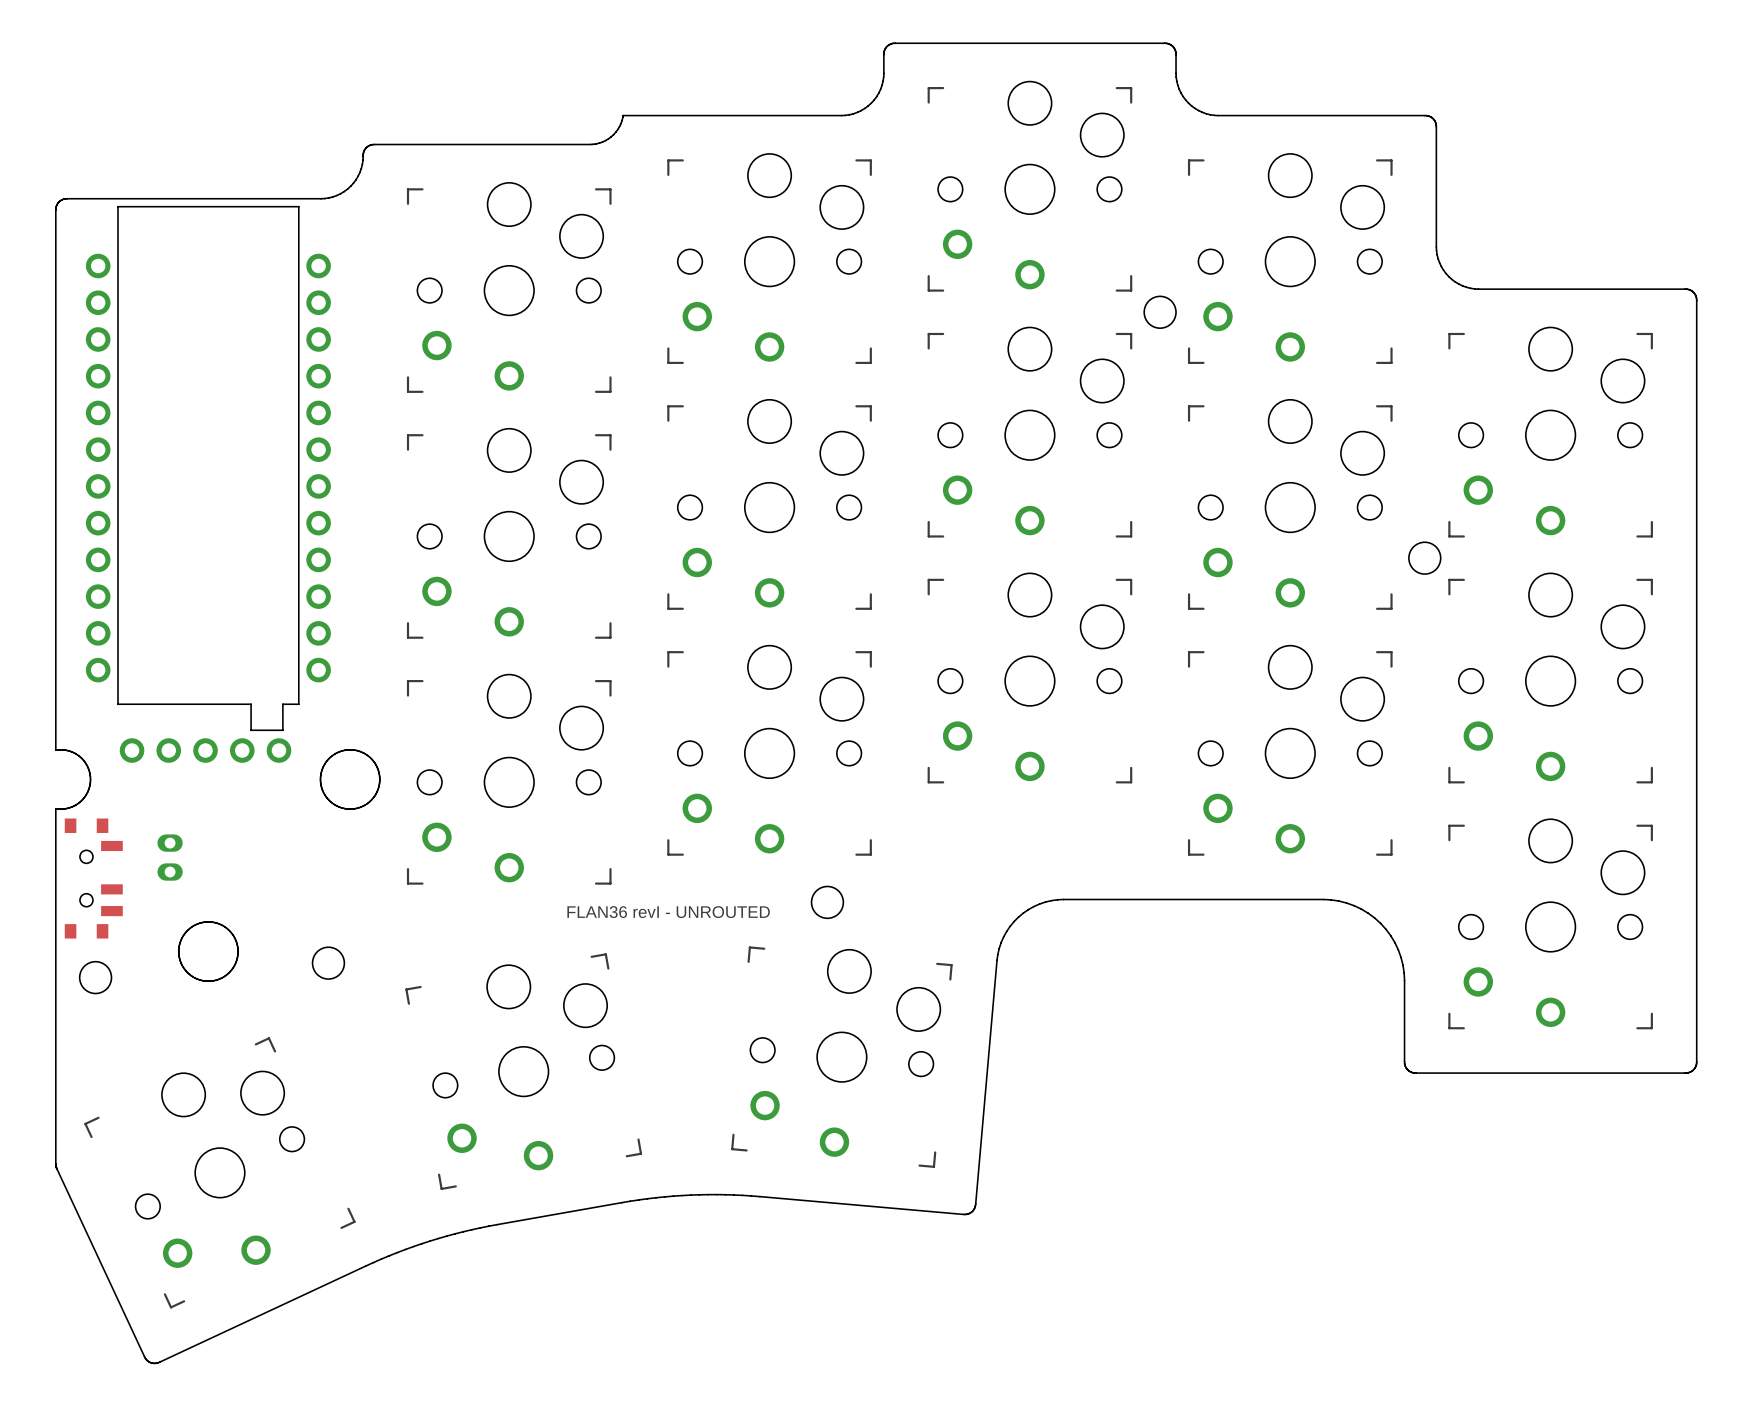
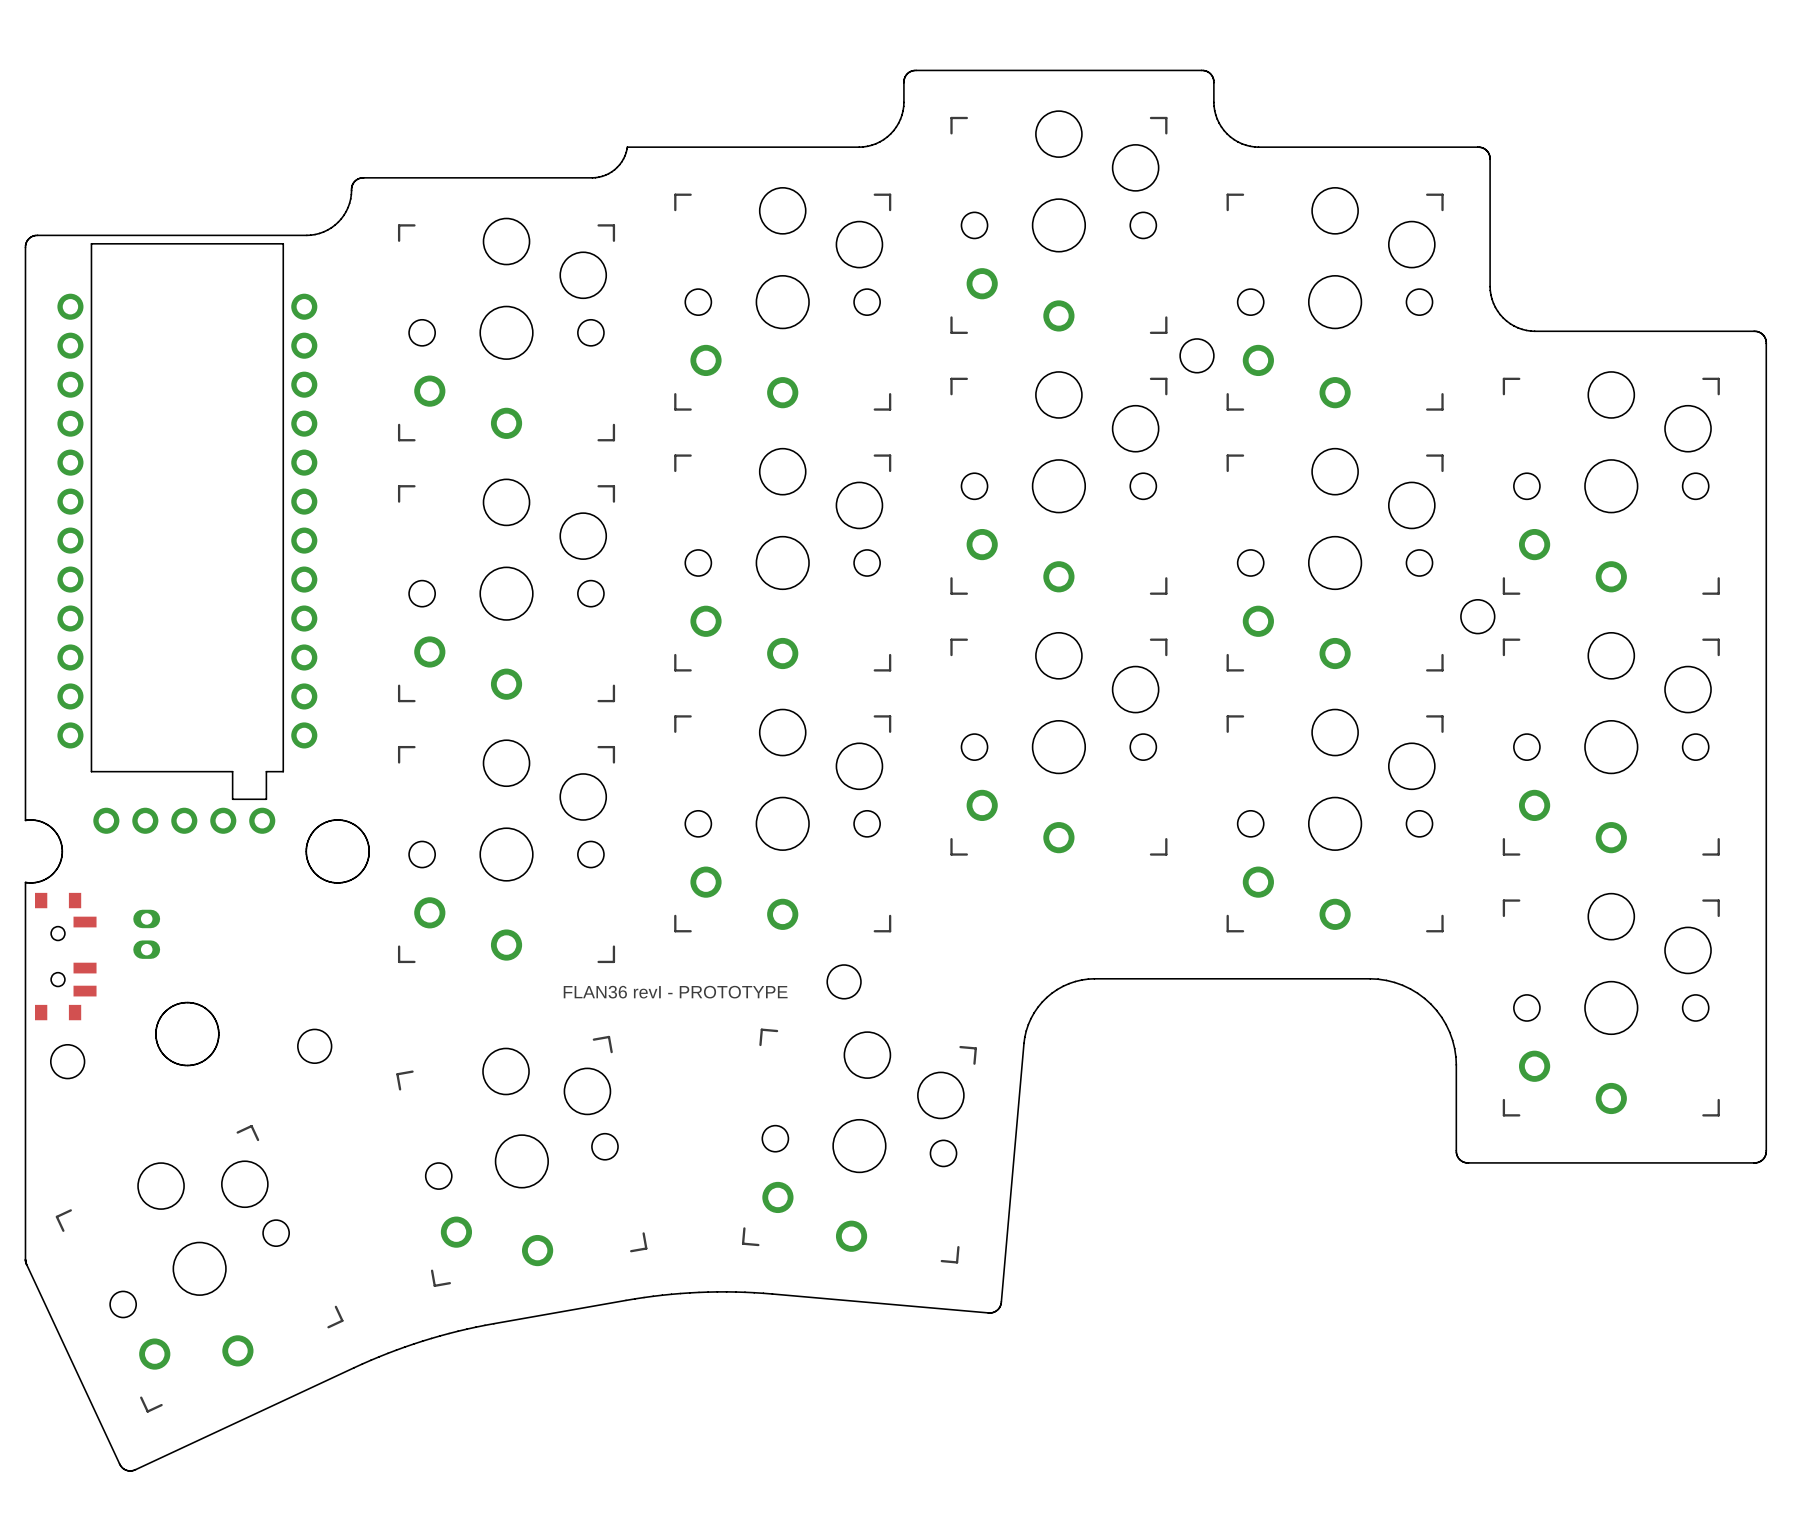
text: FLAN36 revI - UNROUTED (668, 912) -> FLAN36 revI - PROTOTYPE (675, 992)

